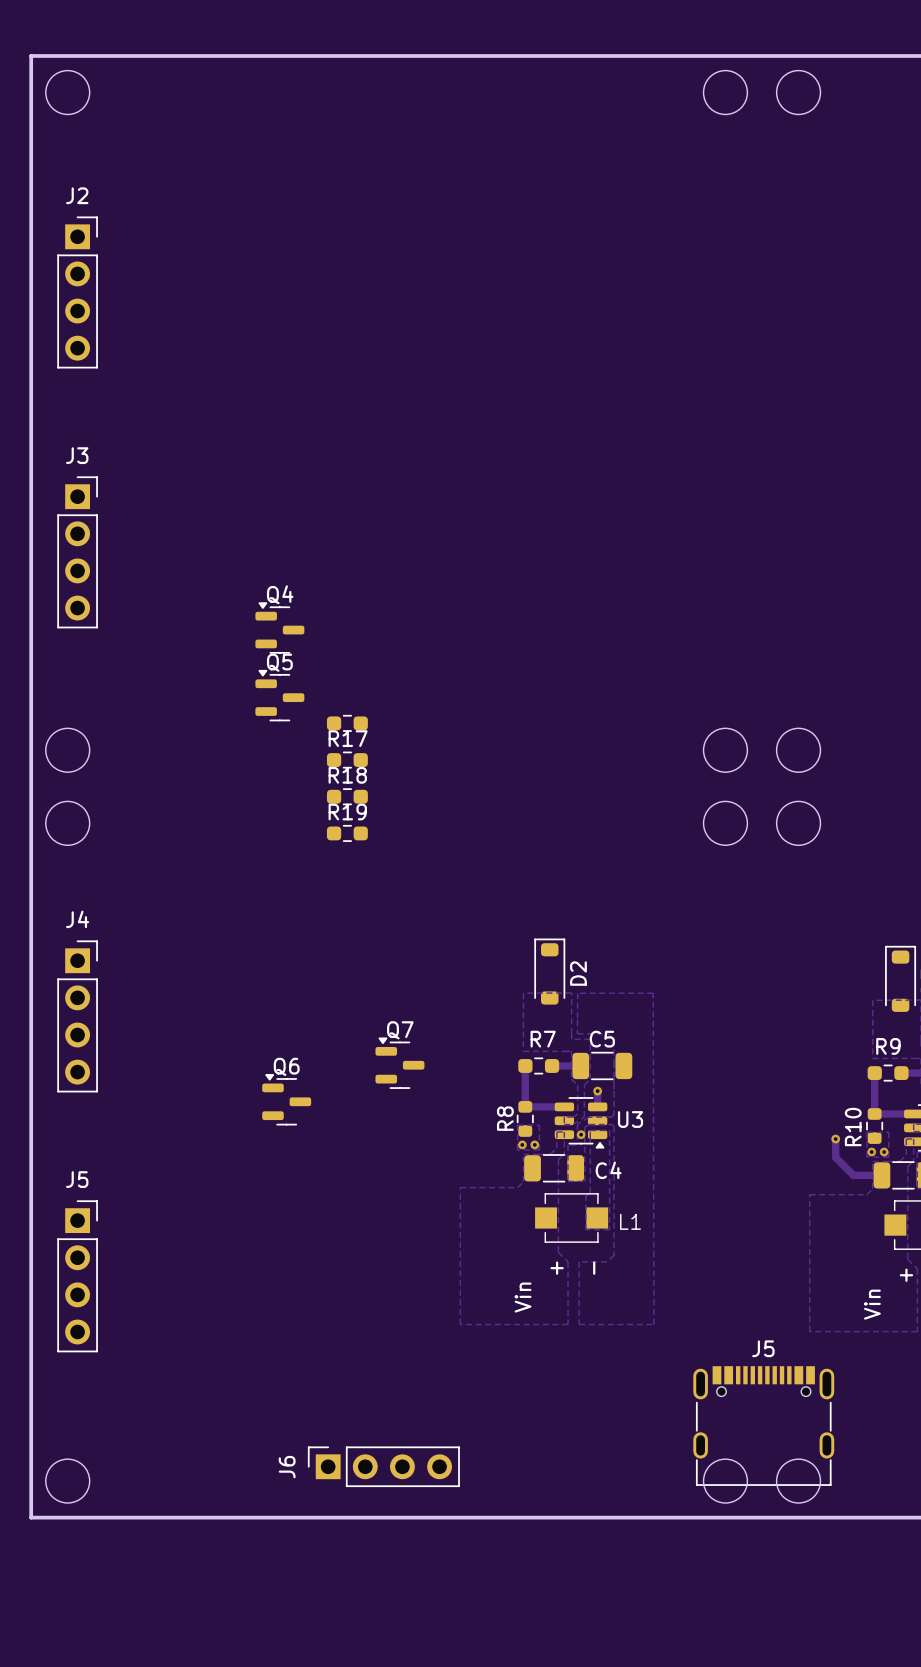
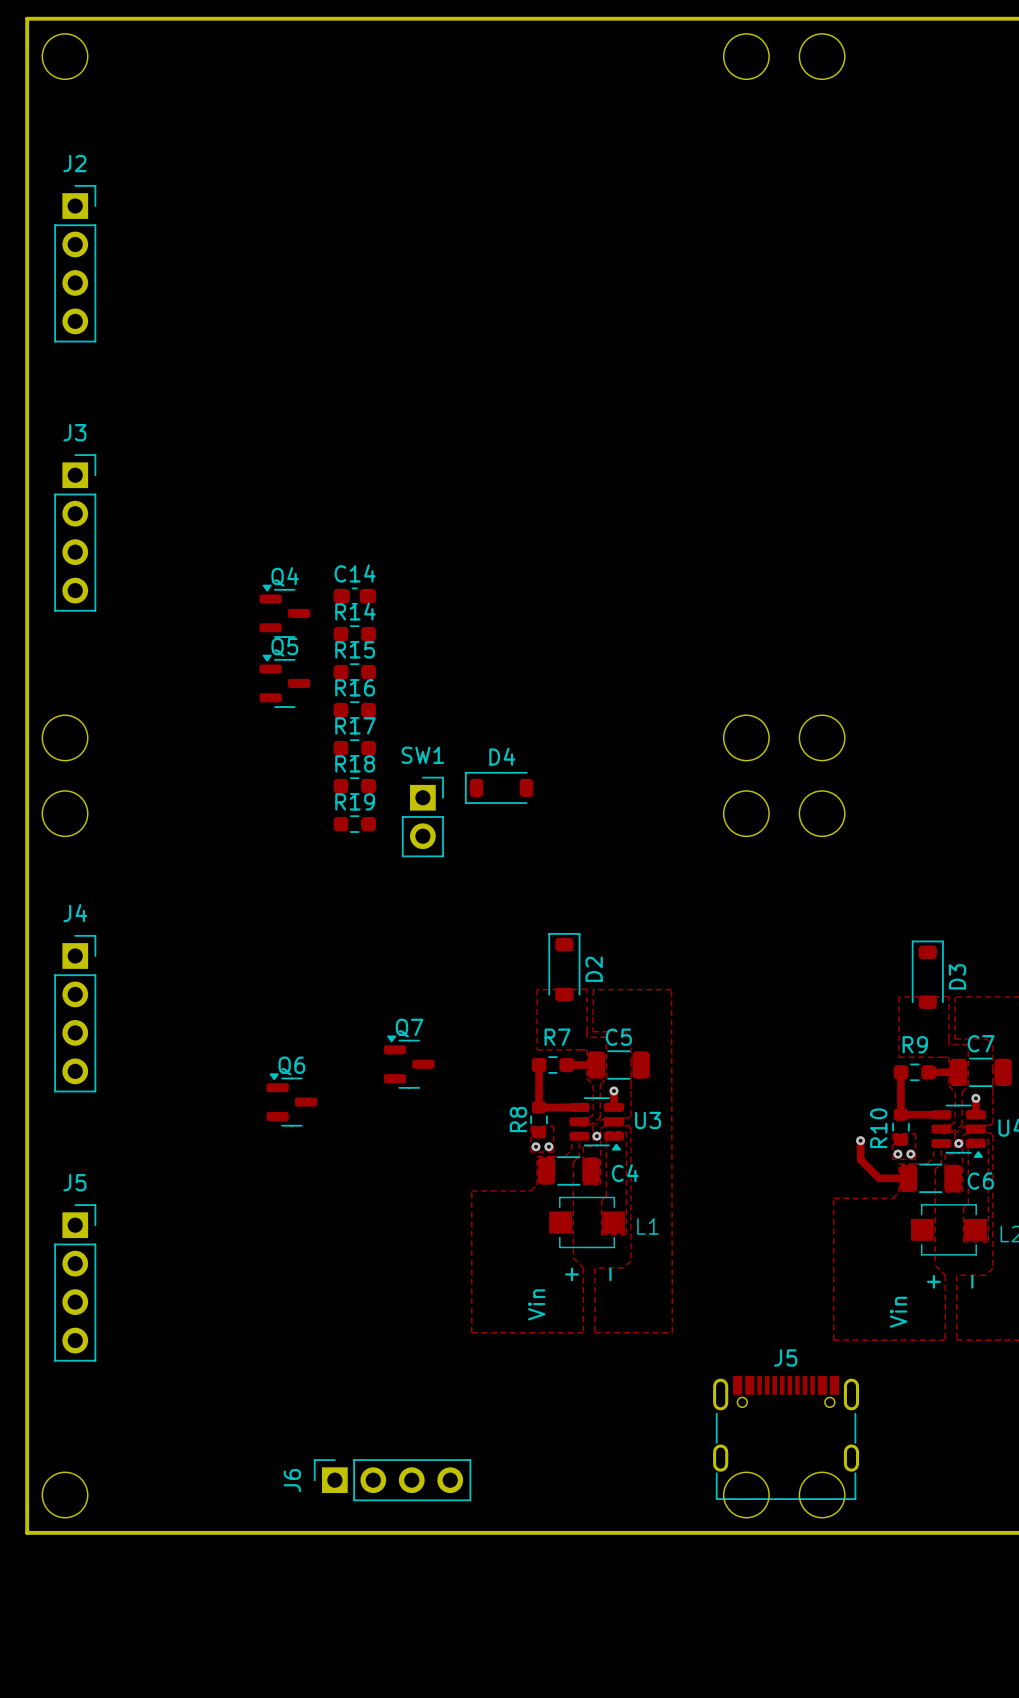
C14: none -> (354, 596)
R14: none -> (354, 634)
R15: none -> (354, 672)
R16 name: none -> R16 (355, 687)
D4: none -> (499, 787)
SW1: none -> (422, 816)

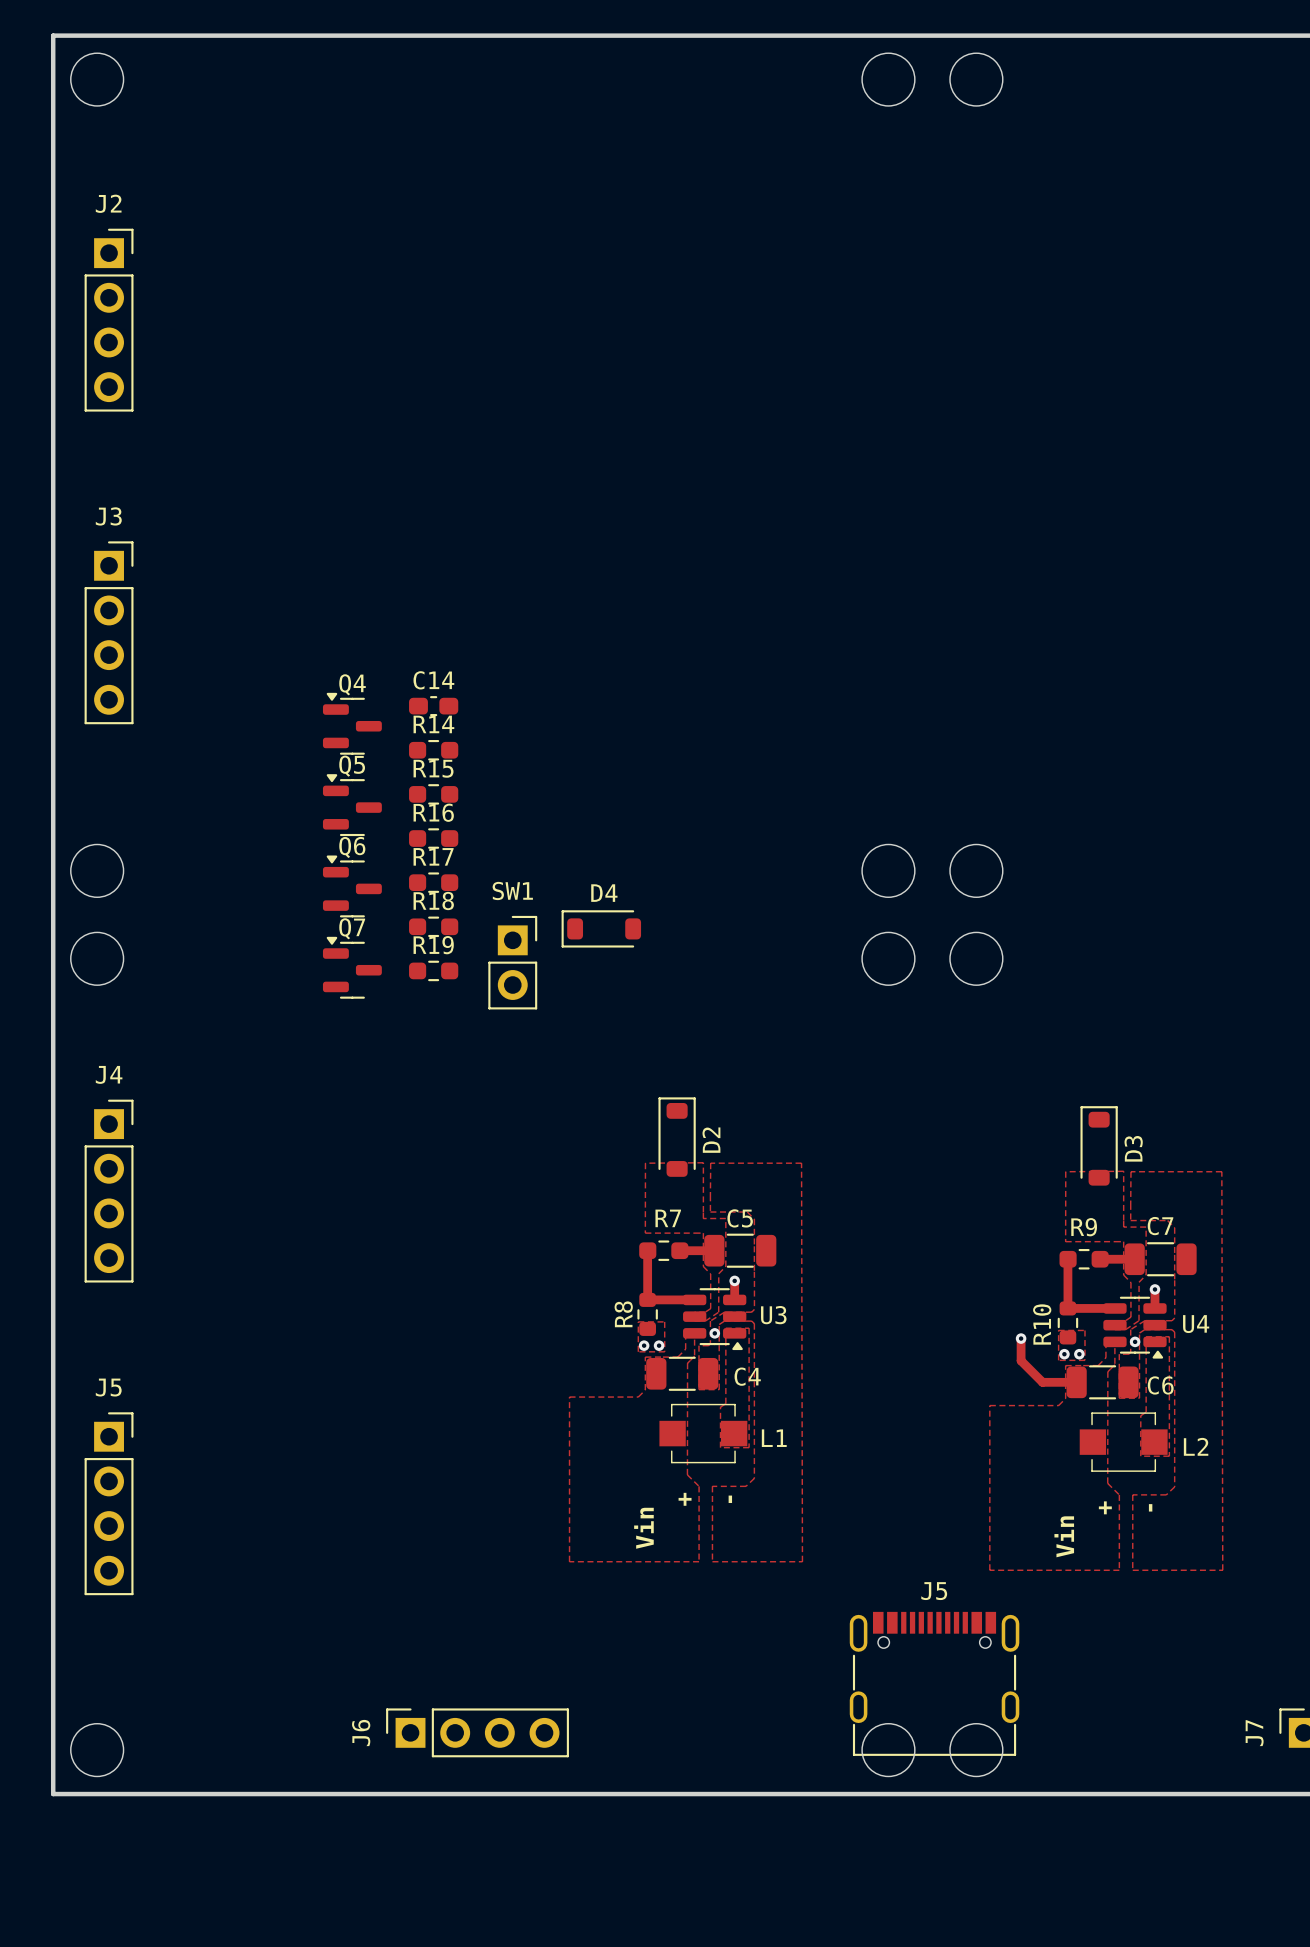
Q7 position: (409, 1062) -> (352, 967)
Q6 position: (291, 1099) -> (352, 886)

